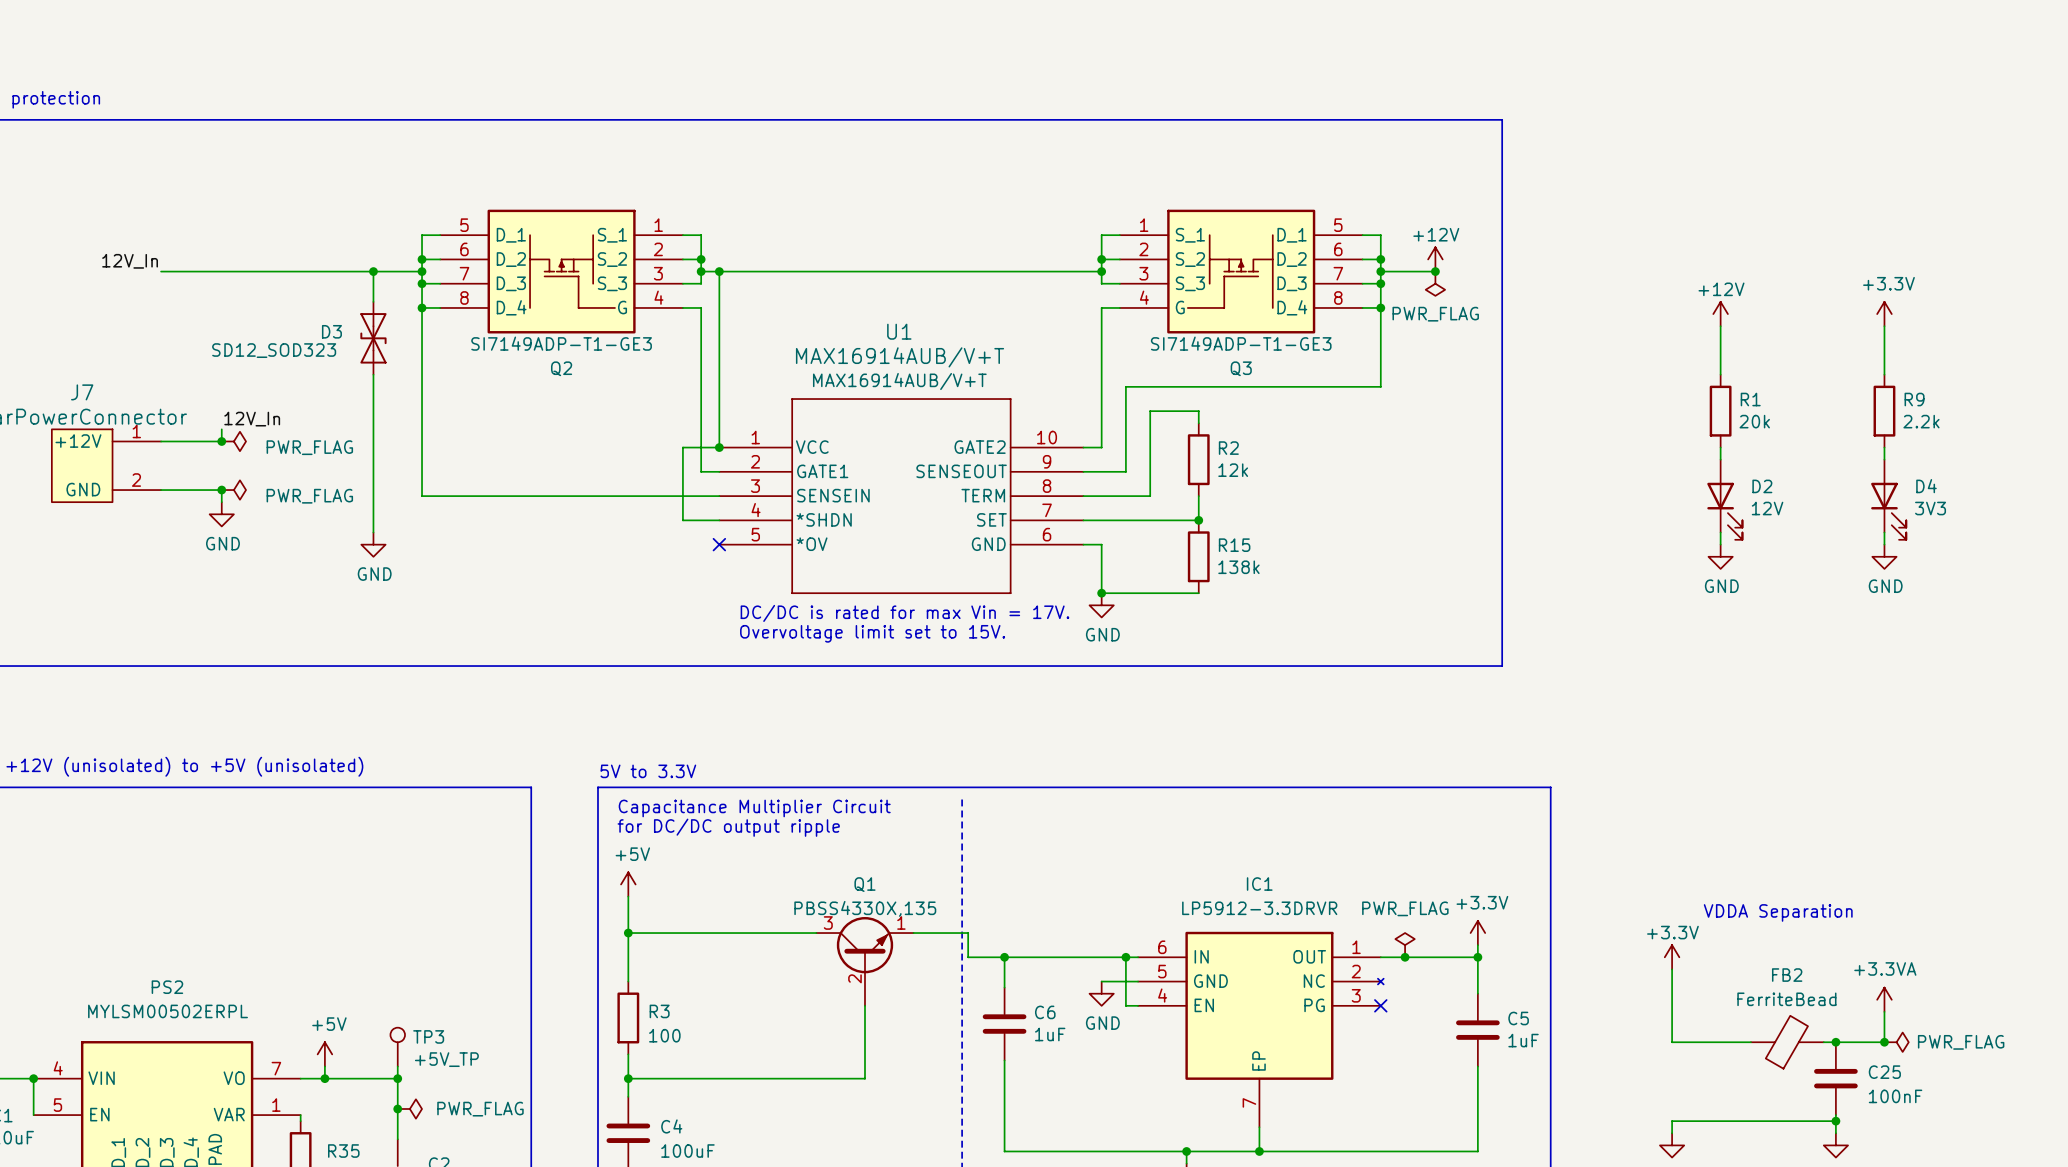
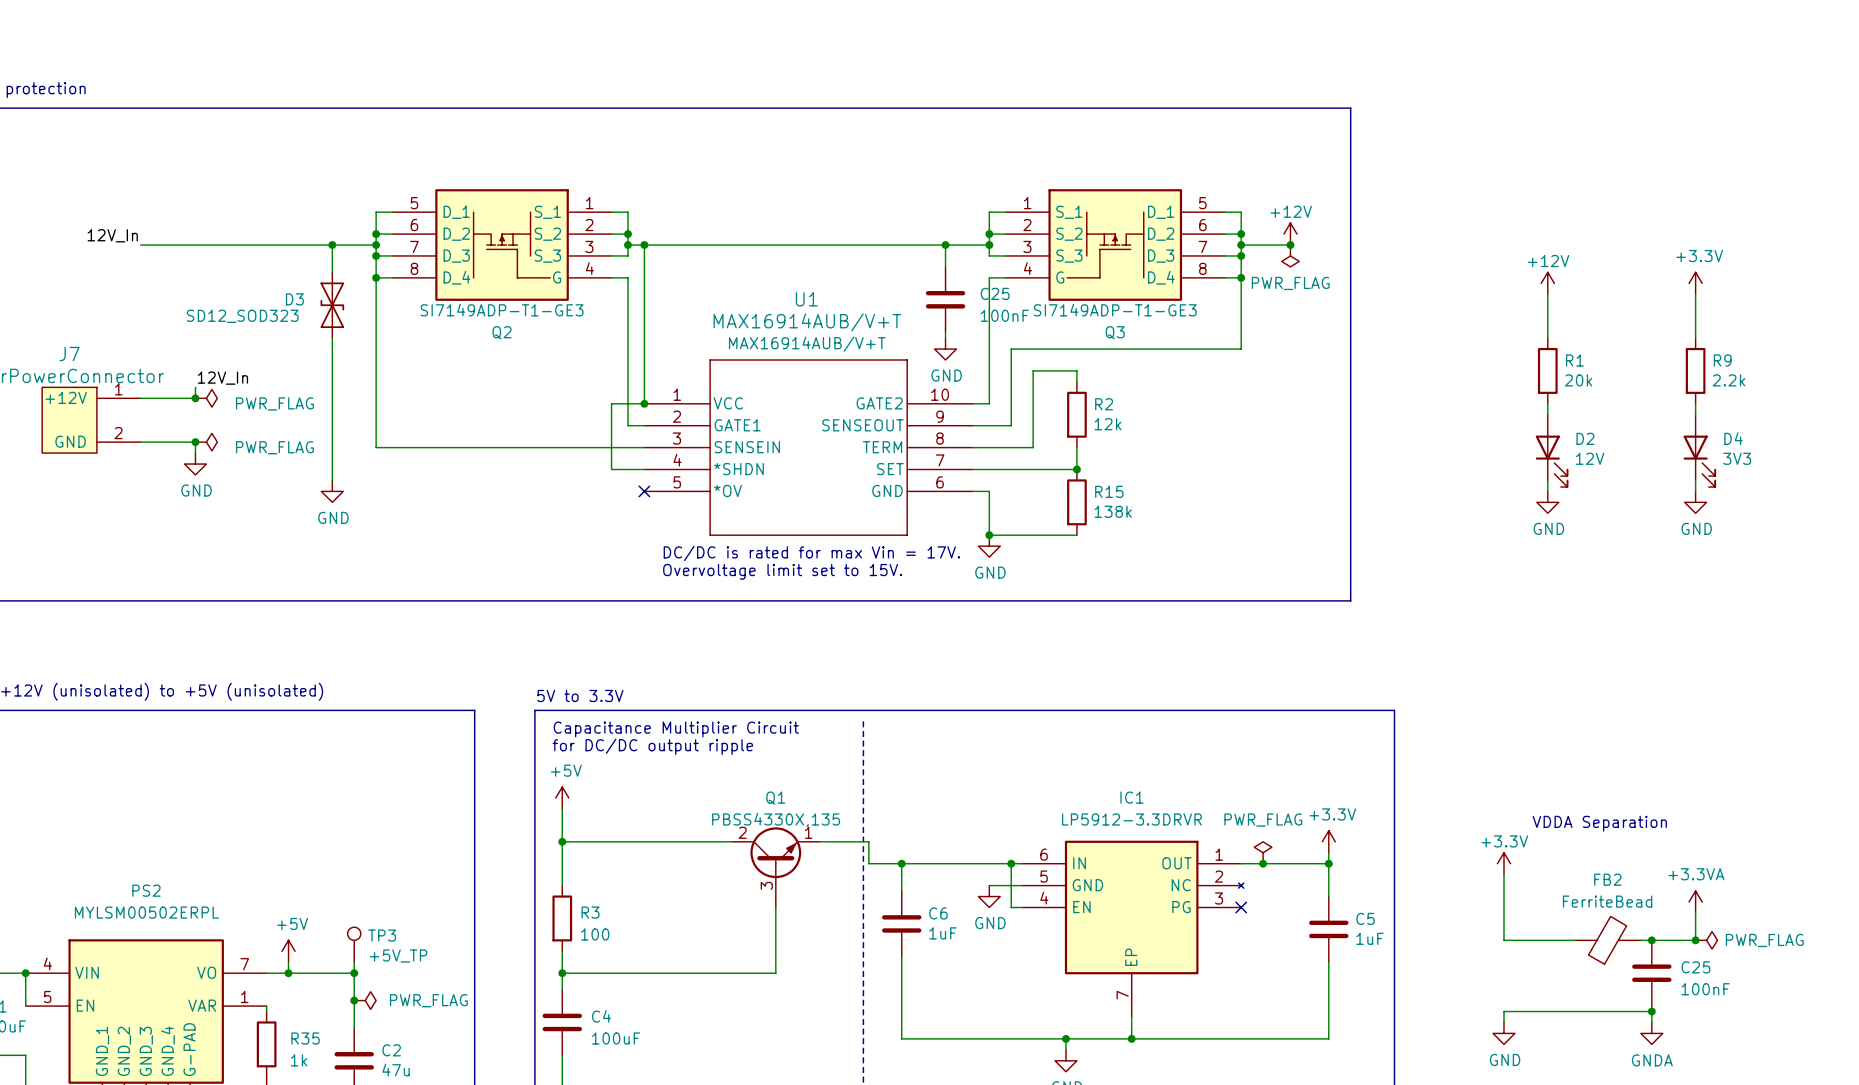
wire: none -> (945, 245) (945, 266)
junction: none -> (945, 245)
C25: none -> 100nF (945, 299)
wire: none -> (945, 332) (945, 338)
power symbol: none -> GND (945, 349)
Q1 symbol: [816, 916, 914, 1006] -> [732, 827, 820, 908]

